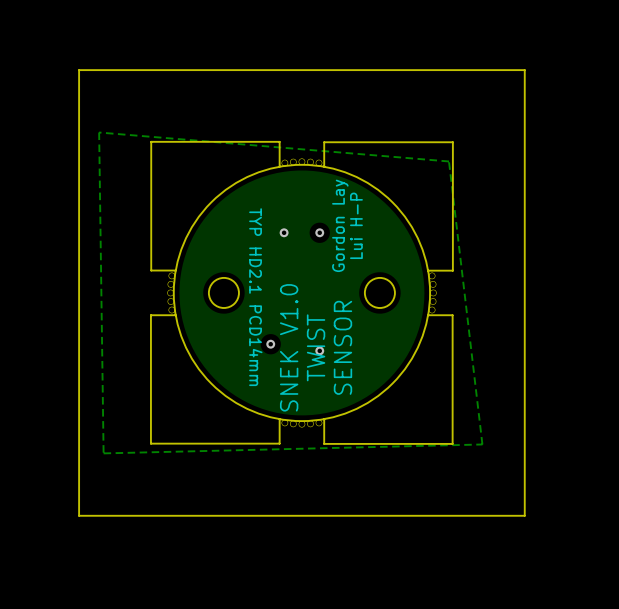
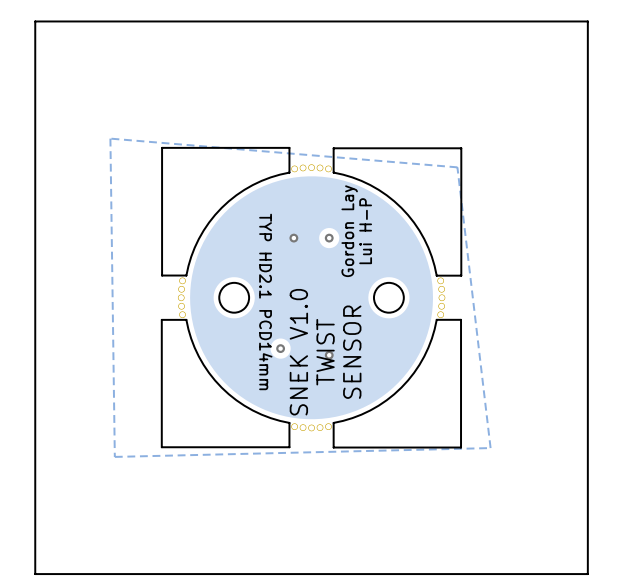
board edge: (524, 70) (79, 70) (79, 515) (524, 515) (524, 70) -> (587, 21) (587, 574) (35, 574) (35, 21) (587, 21)
round board edge: [173, 164, 431, 422] -> none
board edge: none -> (289, 172) (252, 185) (221, 207) (198, 238) (186, 275)
board edge: none -> (333, 172) (370, 185) (401, 207) (424, 239) (436, 275)
board edge: none -> (186, 319) (198, 356) (221, 387) (252, 410) (289, 422)
board edge: none -> (436, 319) (424, 356) (401, 387) (370, 410) (333, 422)

